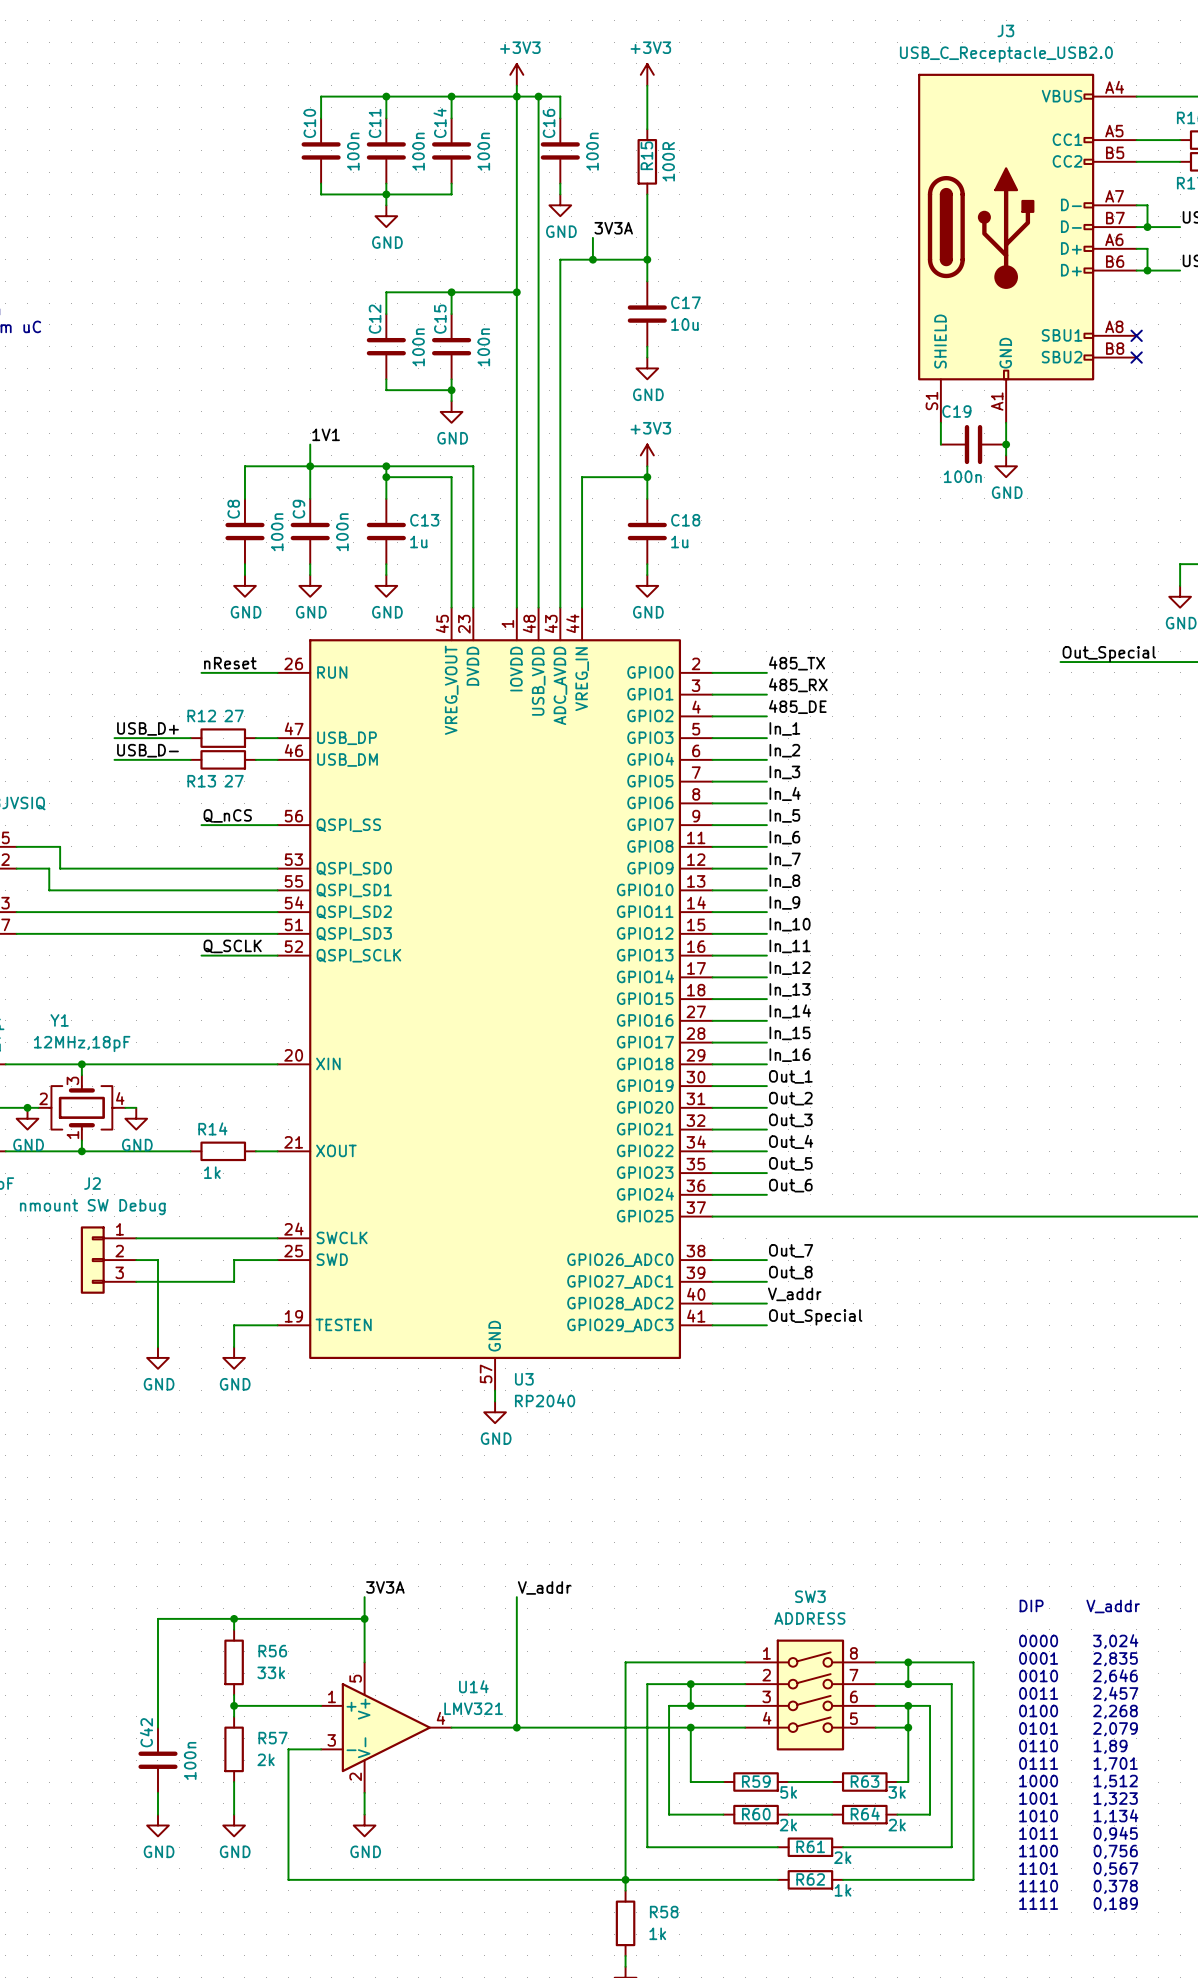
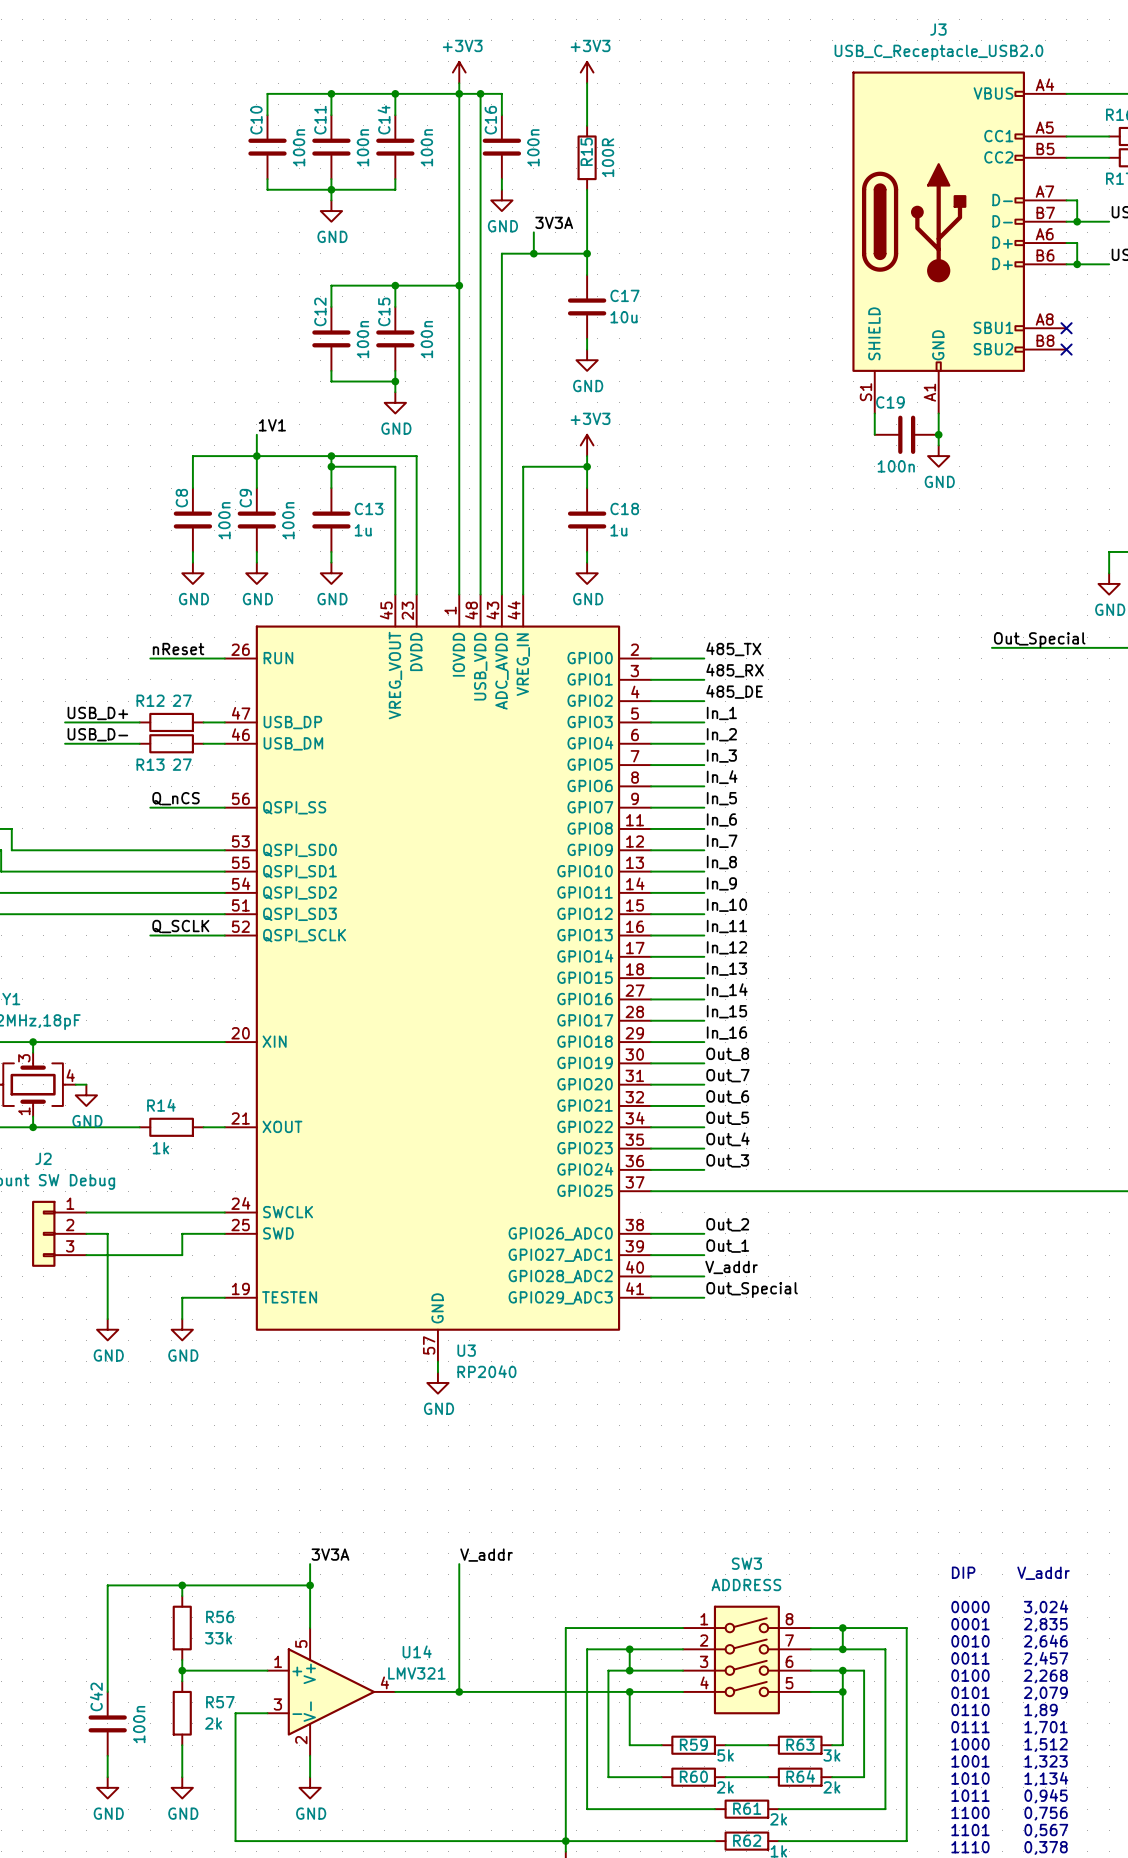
label: Out_1 (790, 1076) -> Out_8 (727, 1054)
label: Out_2 (790, 1098) -> Out_7 (727, 1075)
label: Out_3 (790, 1120) -> Out_6 (727, 1096)
label: Out_4 (791, 1141) -> Out_5 (727, 1118)
label: Out_5 (790, 1163) -> Out_4 (727, 1139)
label: Out_6 (790, 1185) -> Out_3 (727, 1160)
label: Out_7 (791, 1250) -> Out_2 (727, 1224)
label: Out_8 (790, 1272) -> Out_1 (727, 1246)

